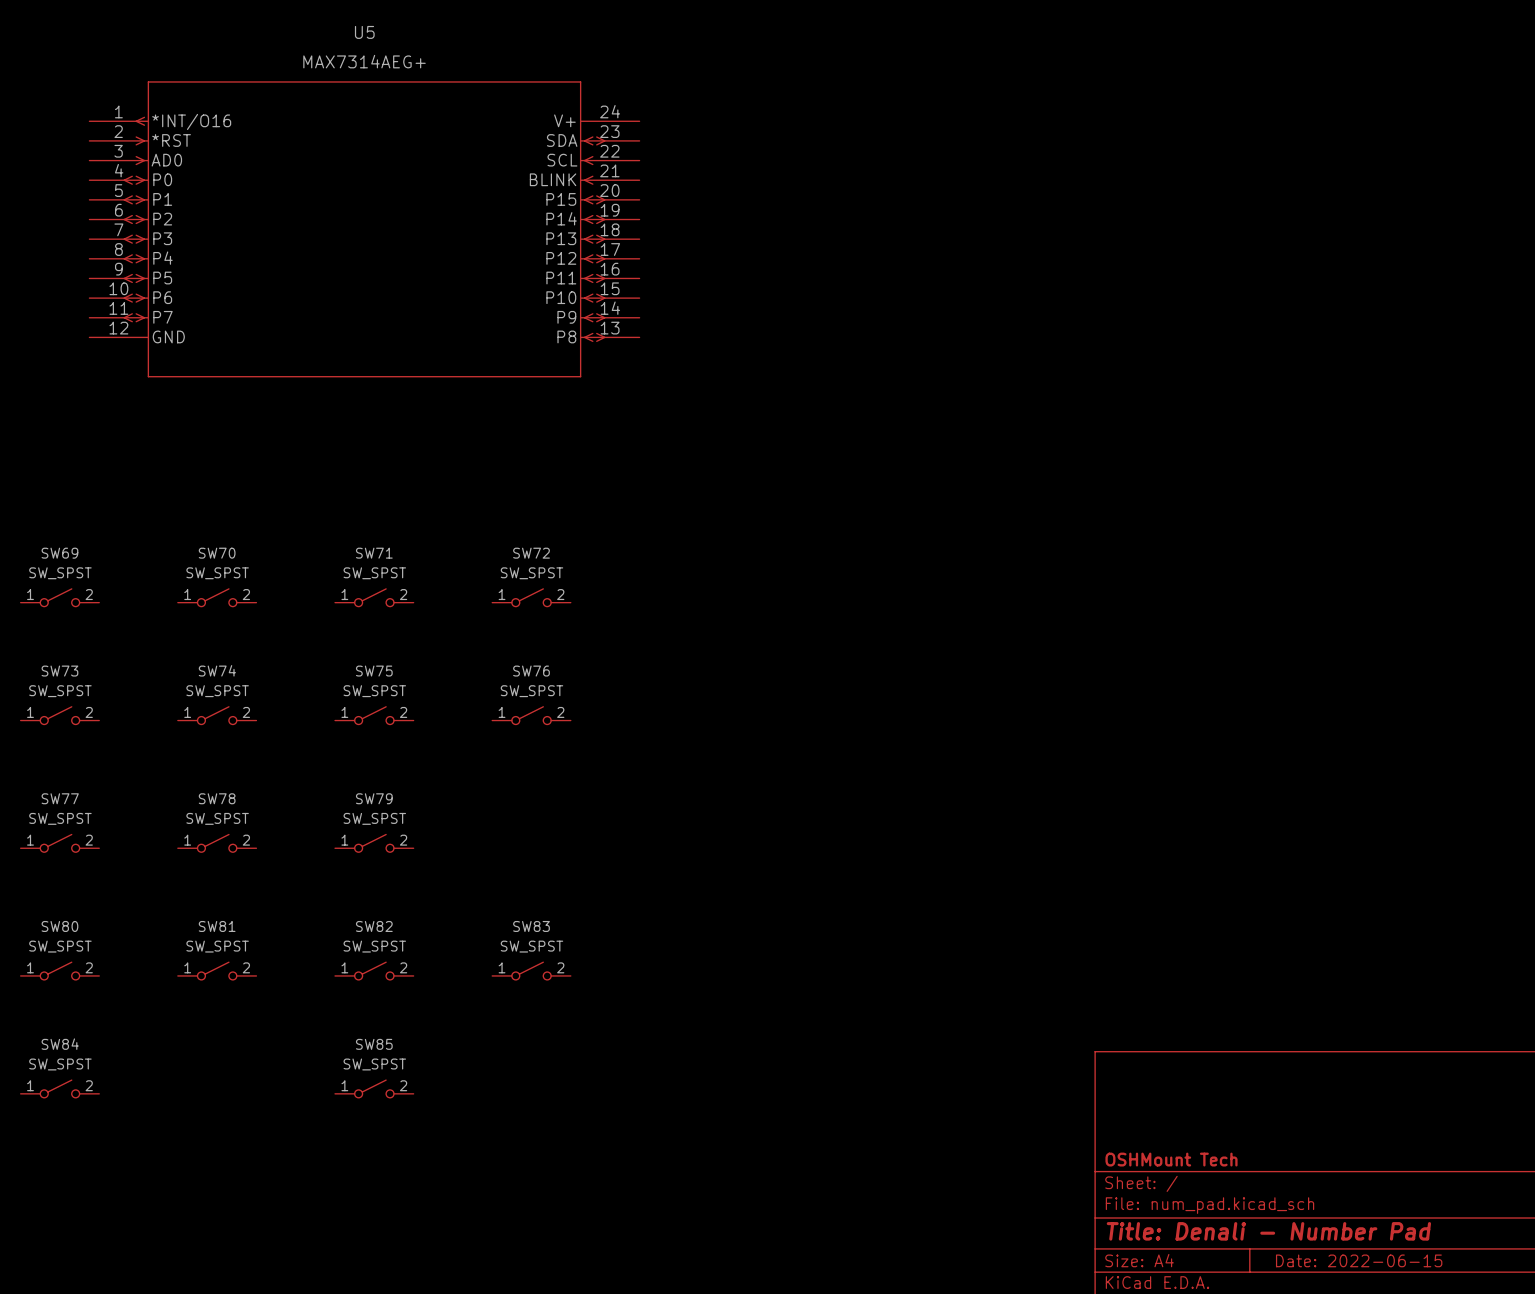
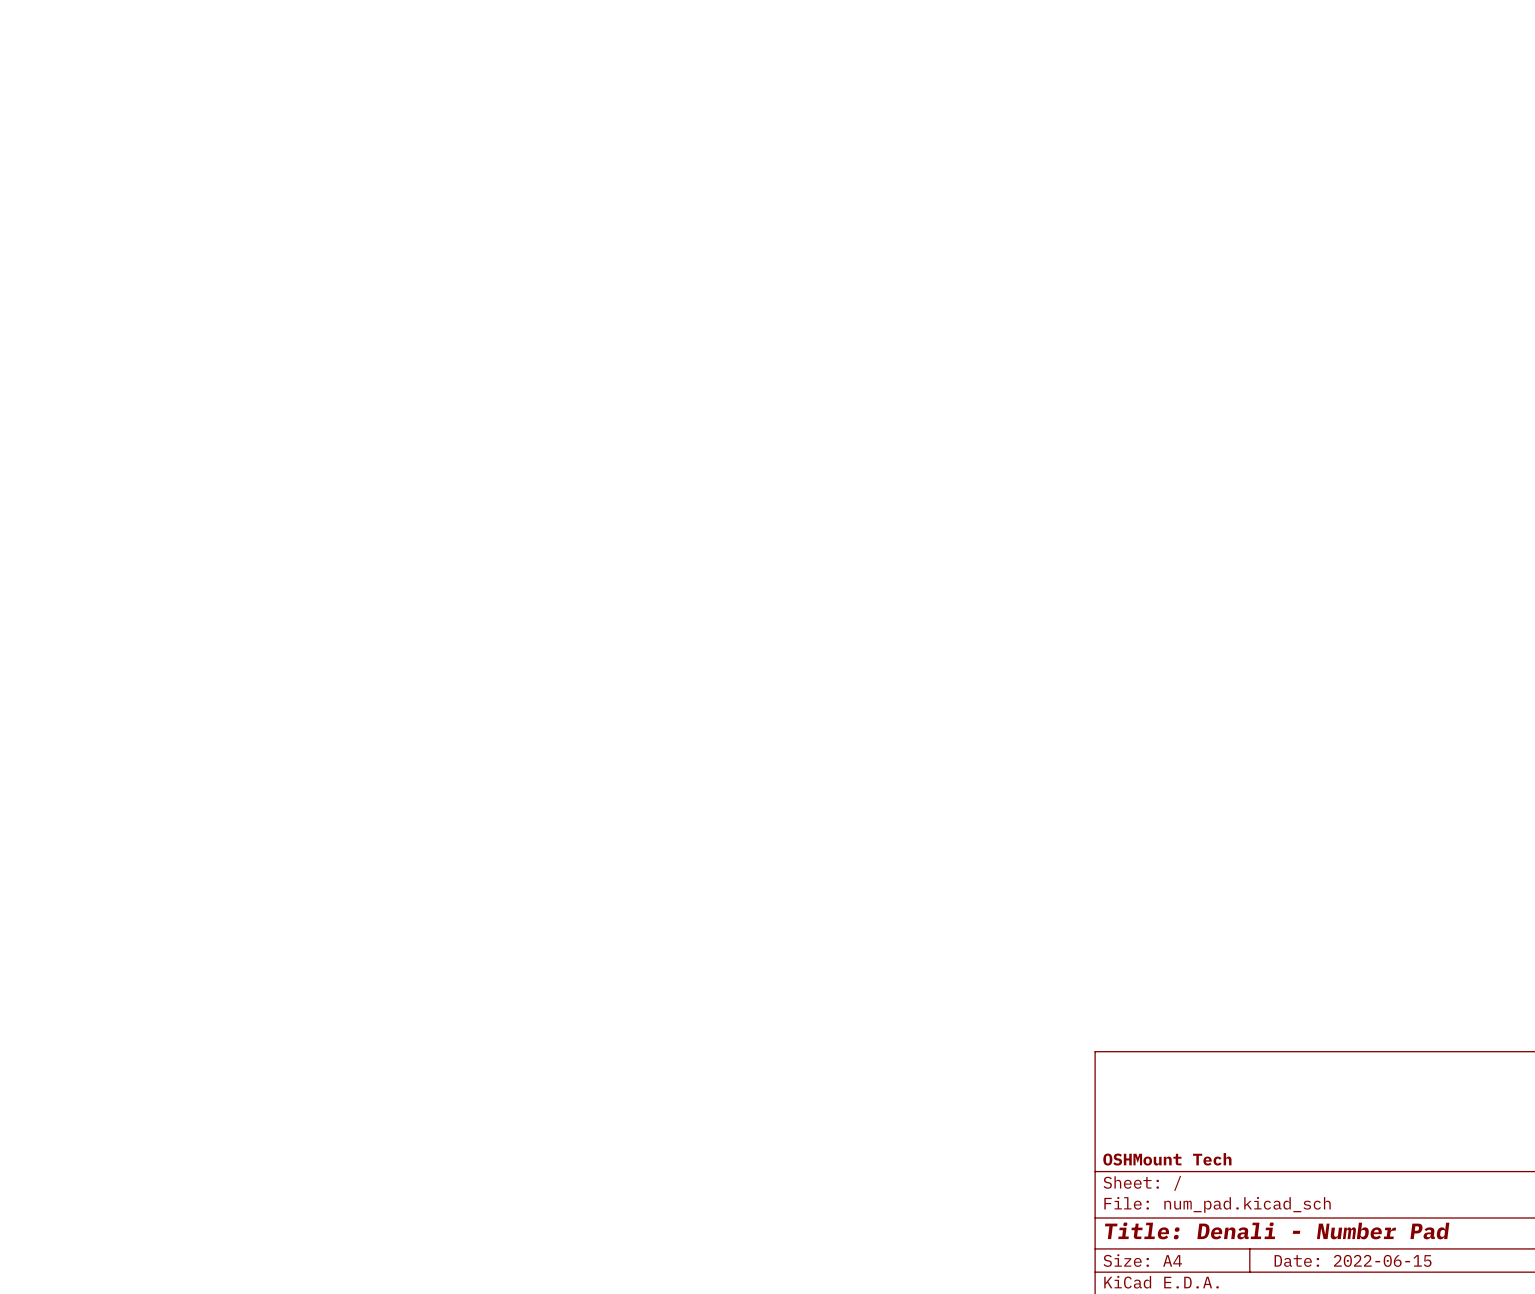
U5: MAX7314AEG+ (364, 229) -> none
SW69: SW_SPST (59, 597) -> none
SW70: SW_SPST (217, 597) -> none
SW71: SW_SPST (374, 597) -> none
SW72: SW_SPST (531, 597) -> none
SW73: SW_SPST (59, 715) -> none
SW74: SW_SPST (217, 715) -> none
SW75: SW_SPST (374, 715) -> none
SW76: SW_SPST (531, 715) -> none
SW77: SW_SPST (59, 843) -> none
SW78: SW_SPST (217, 843) -> none
SW79: SW_SPST (374, 843) -> none
SW80: SW_SPST (59, 971) -> none
SW81: SW_SPST (217, 971) -> none
SW82: SW_SPST (374, 971) -> none
SW83: SW_SPST (531, 971) -> none
SW84: SW_SPST (59, 1088) -> none
SW85: SW_SPST (374, 1088) -> none

